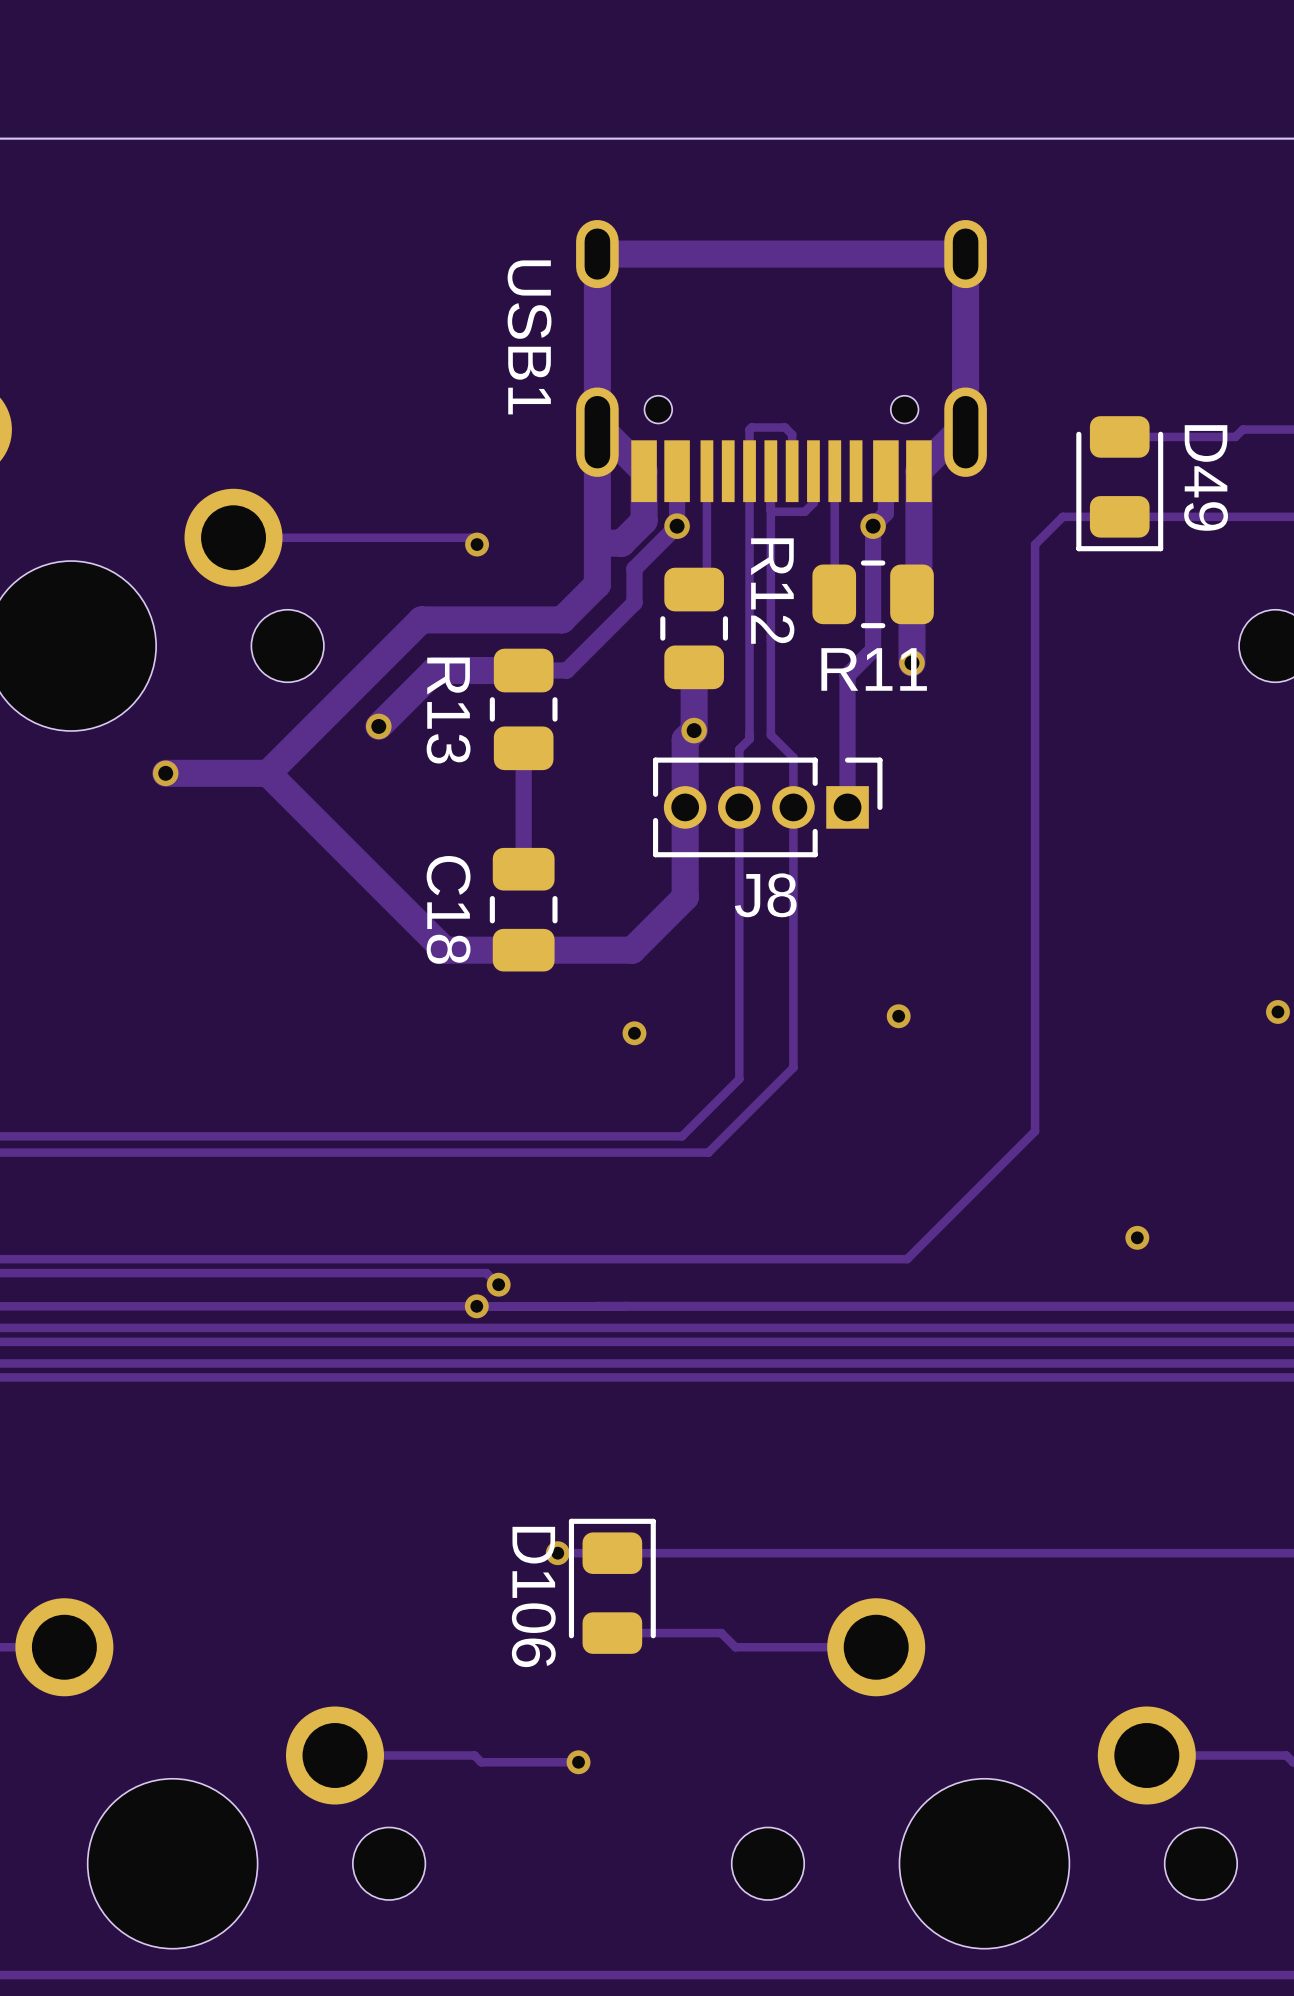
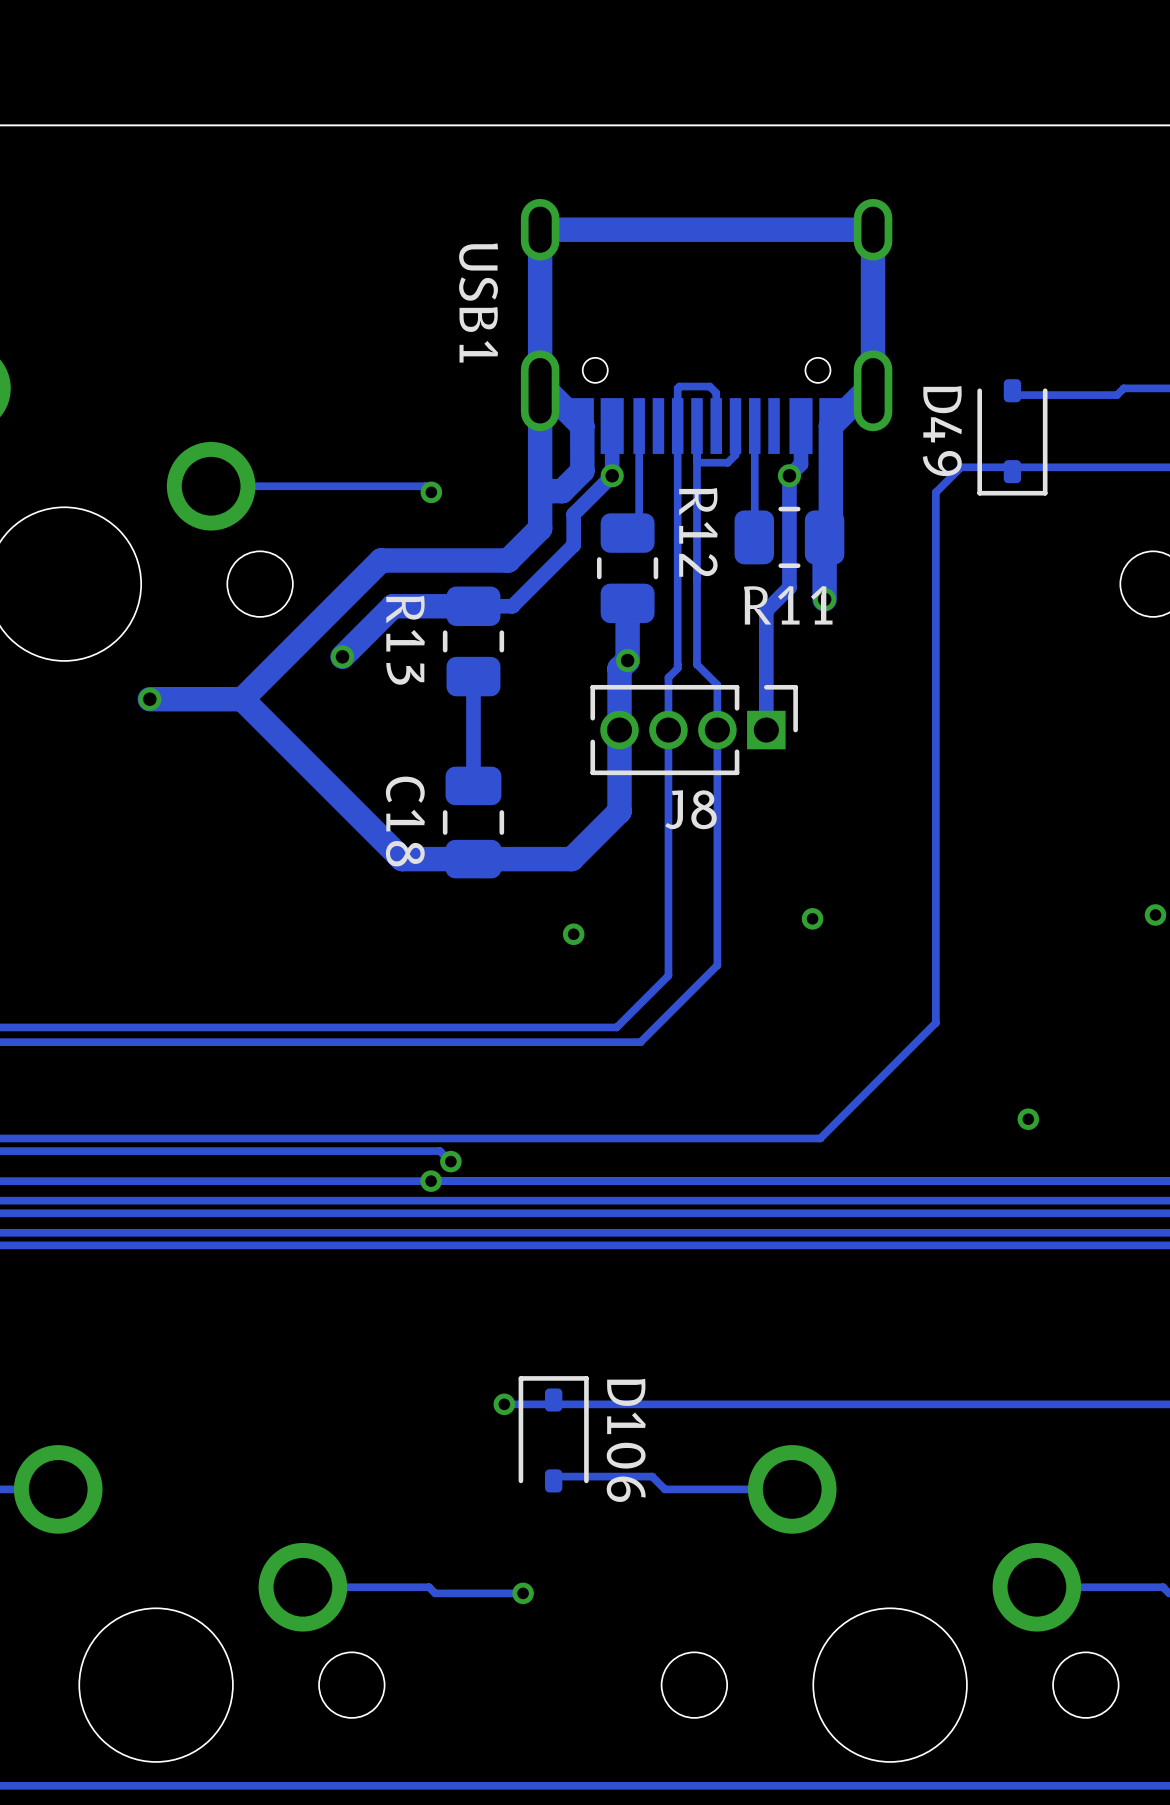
D49 footprint: [1076, 416, 1164, 552] -> [977, 379, 1048, 496]
D49 name position: D49 (1206, 477) -> D49 (942, 431)
D106 footprint: [568, 1518, 656, 1654] -> [518, 1376, 589, 1493]
D106 name position: D106 (533, 1596) -> D106 (626, 1440)

